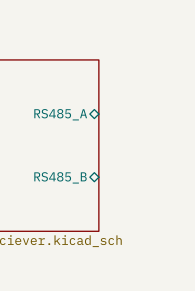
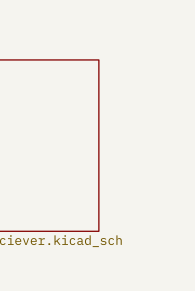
sheet pin: RS485_A (60, 114) -> none
sheet pin: RS485_B (60, 177) -> none

